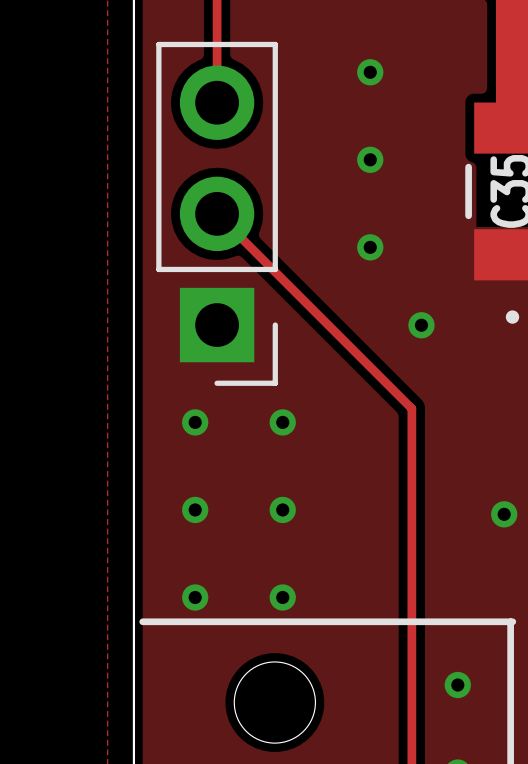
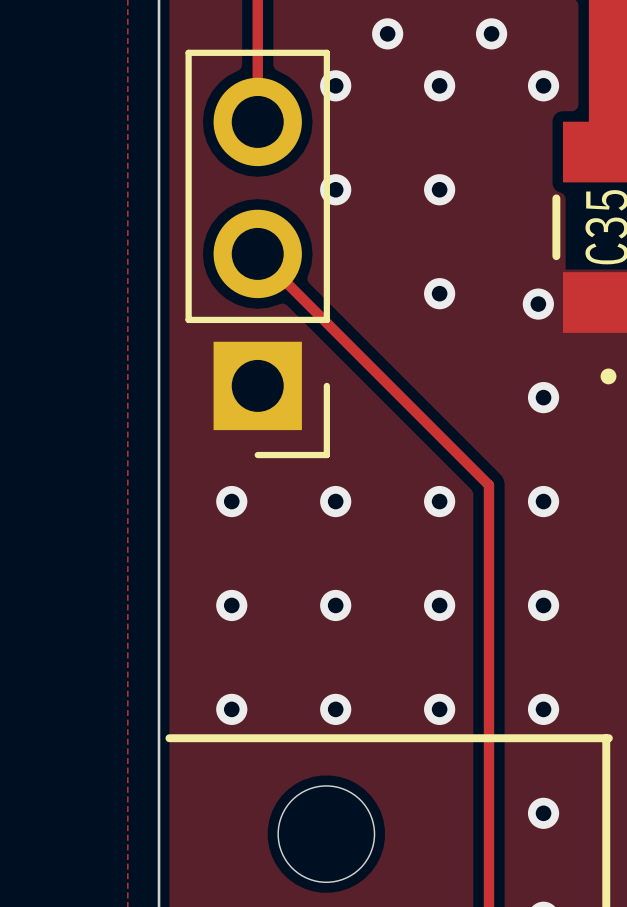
via: none -> (387, 33)
via: none -> (491, 33)
via: none -> (335, 85)
via: none -> (543, 85)
via: none -> (335, 189)
via: none -> (538, 304)
via position: (421, 325) -> (543, 397)
via: none -> (439, 501)
via: none -> (543, 501)
via: none -> (439, 605)
via: none -> (543, 605)
via: (504, 514) -> none
via: none -> (439, 709)
via: none -> (543, 709)

